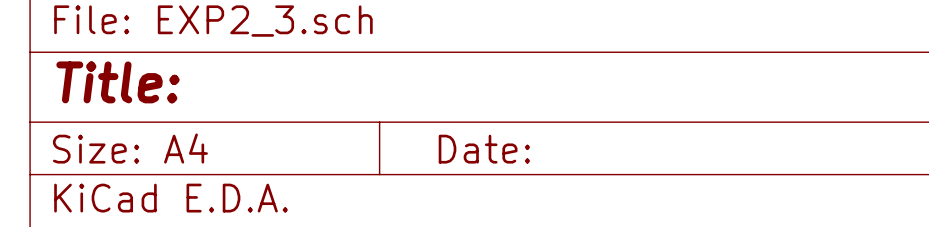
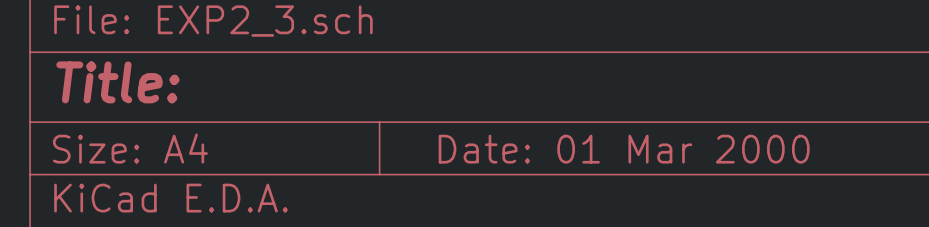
title block: Date: (484, 149) -> Date: 01 Mar 2000 (624, 149)

